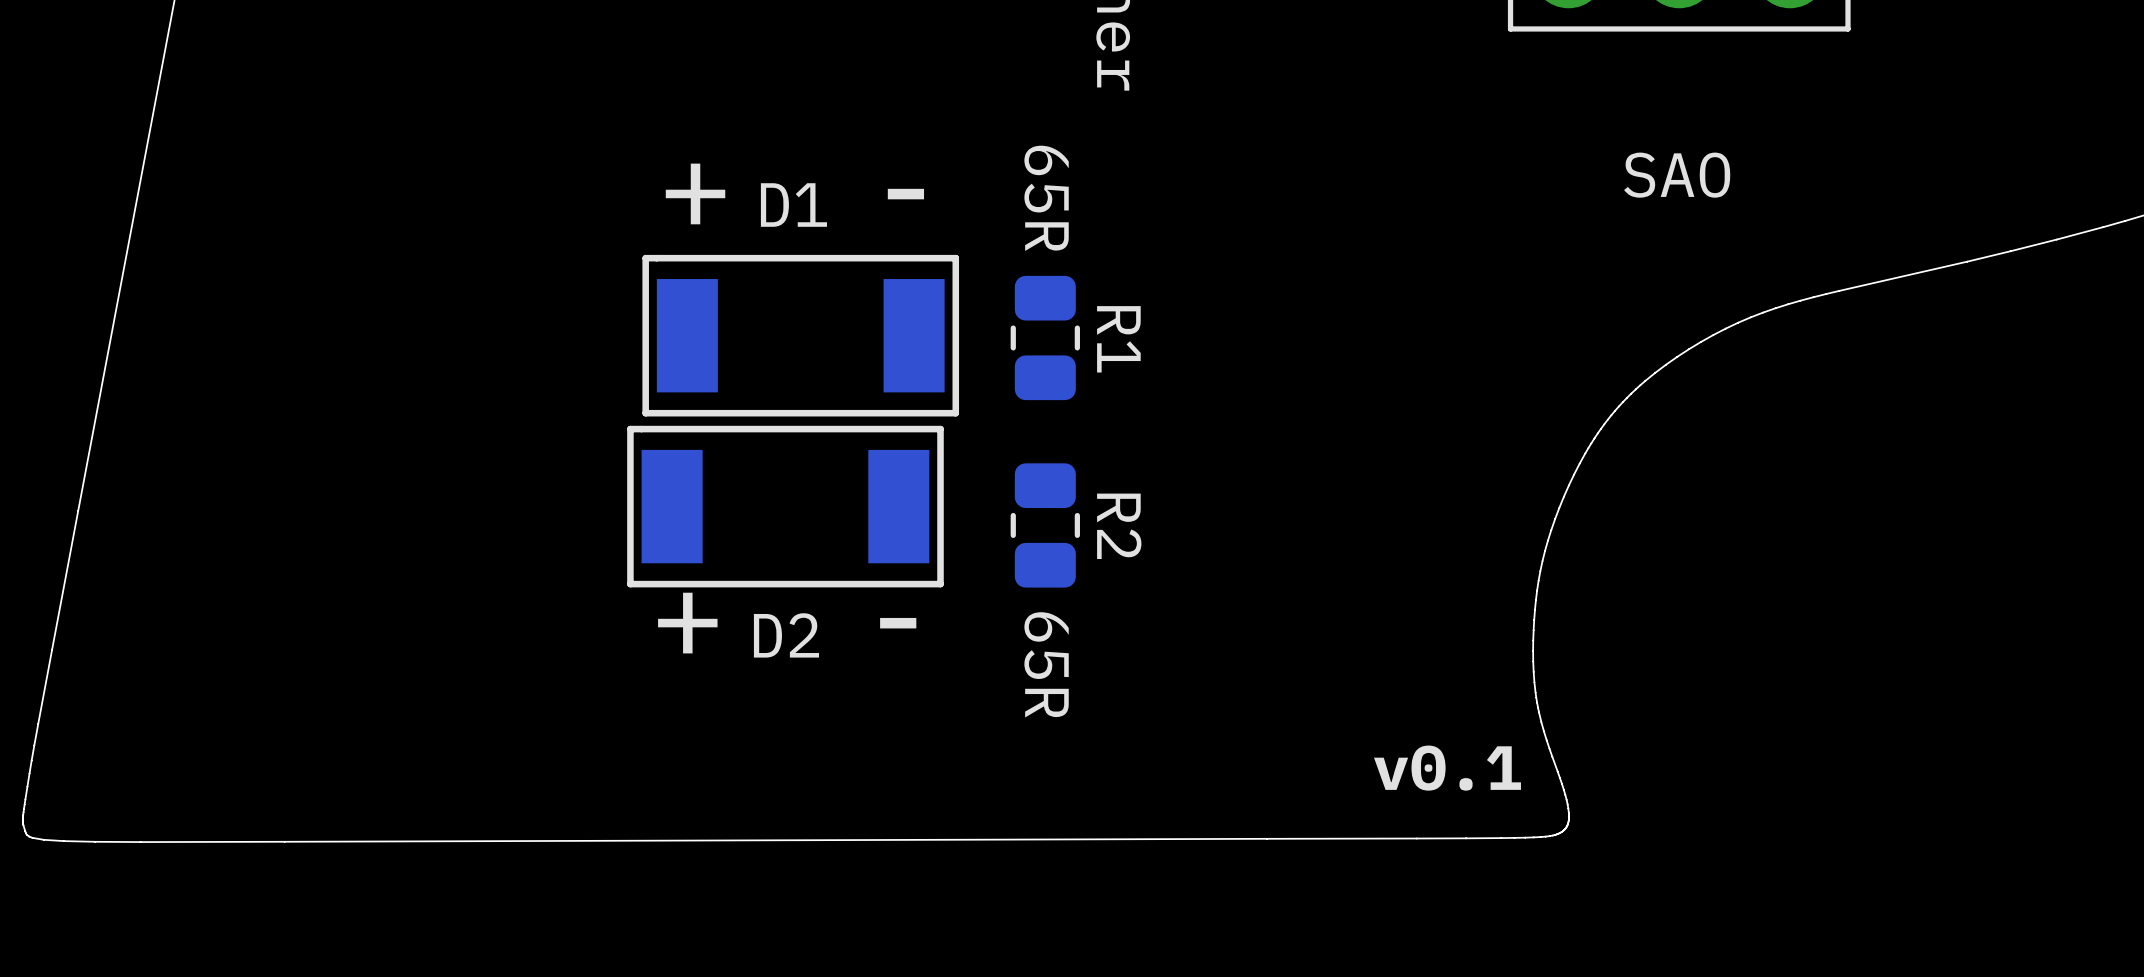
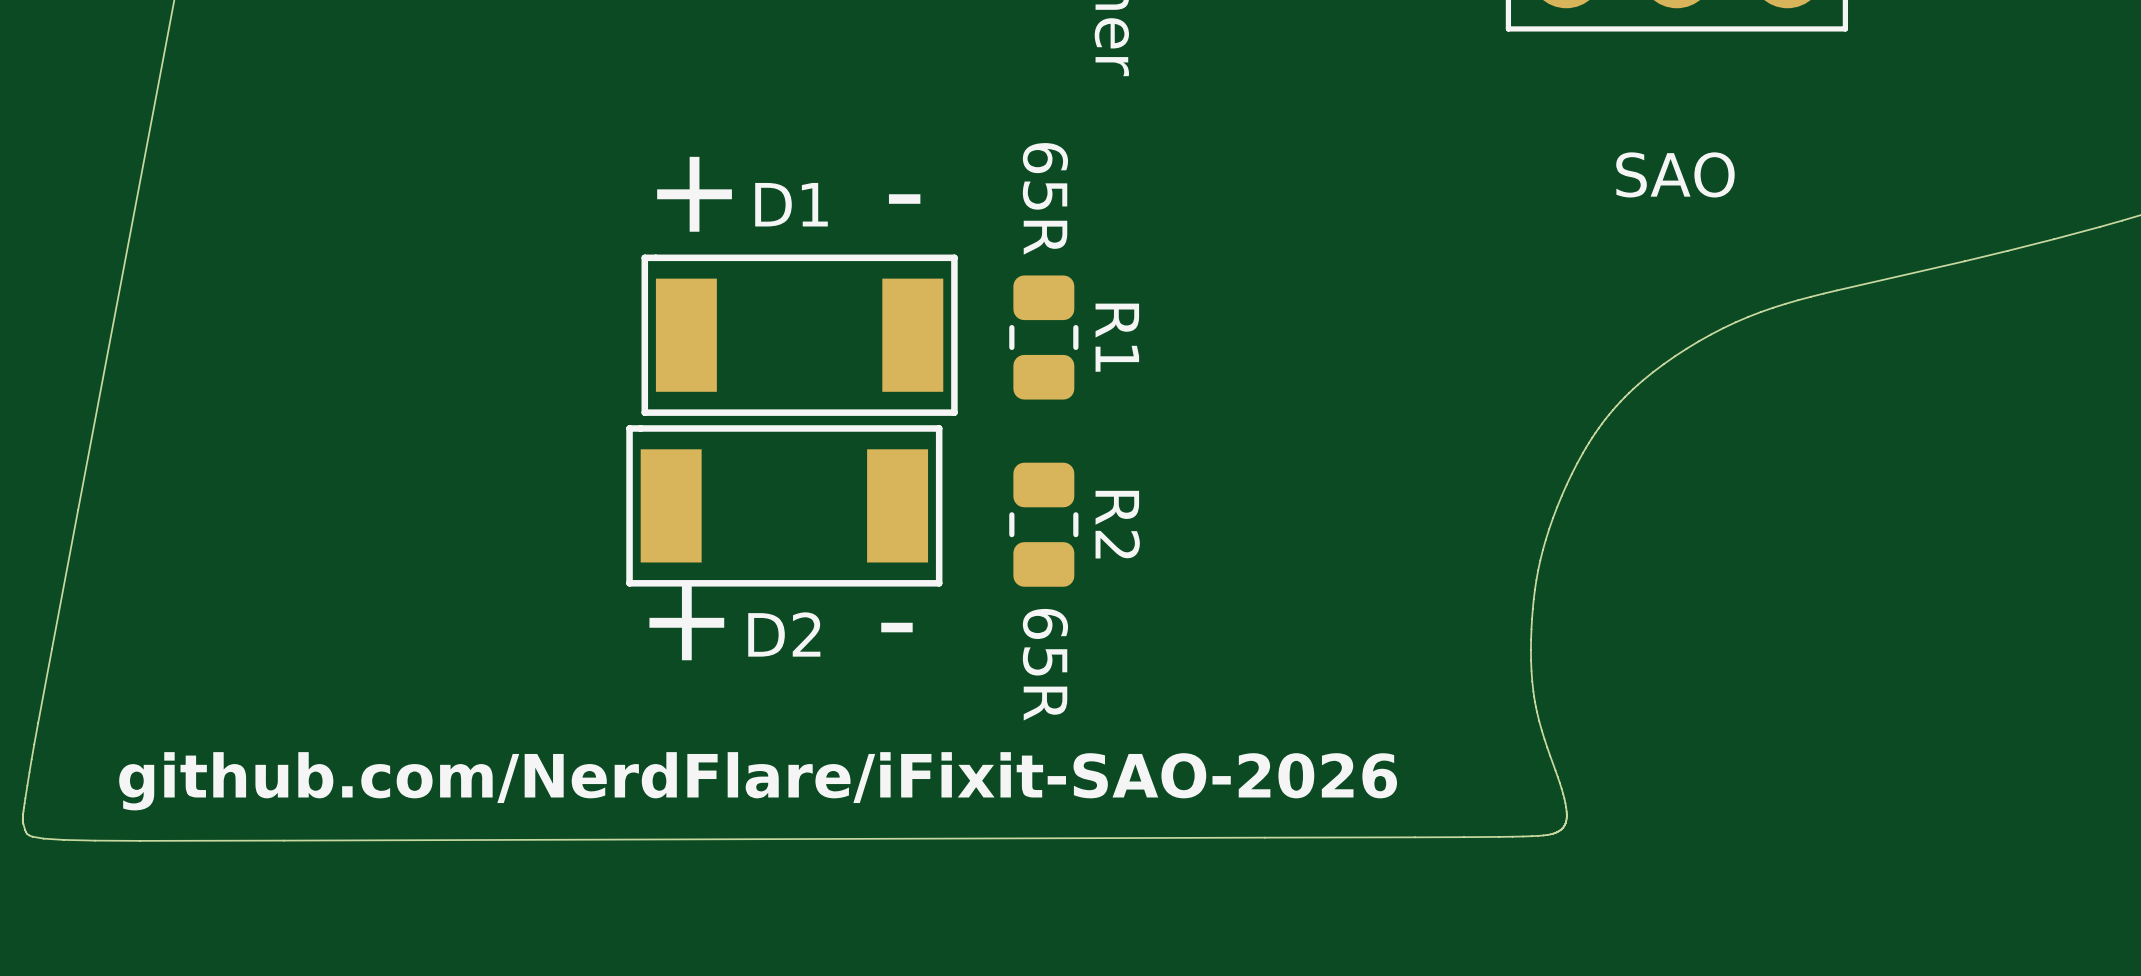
text: v0.1 (1447, 768) -> none
text: none -> github.com/NerdFlare/iFixit-SAO-2026 (758, 781)

